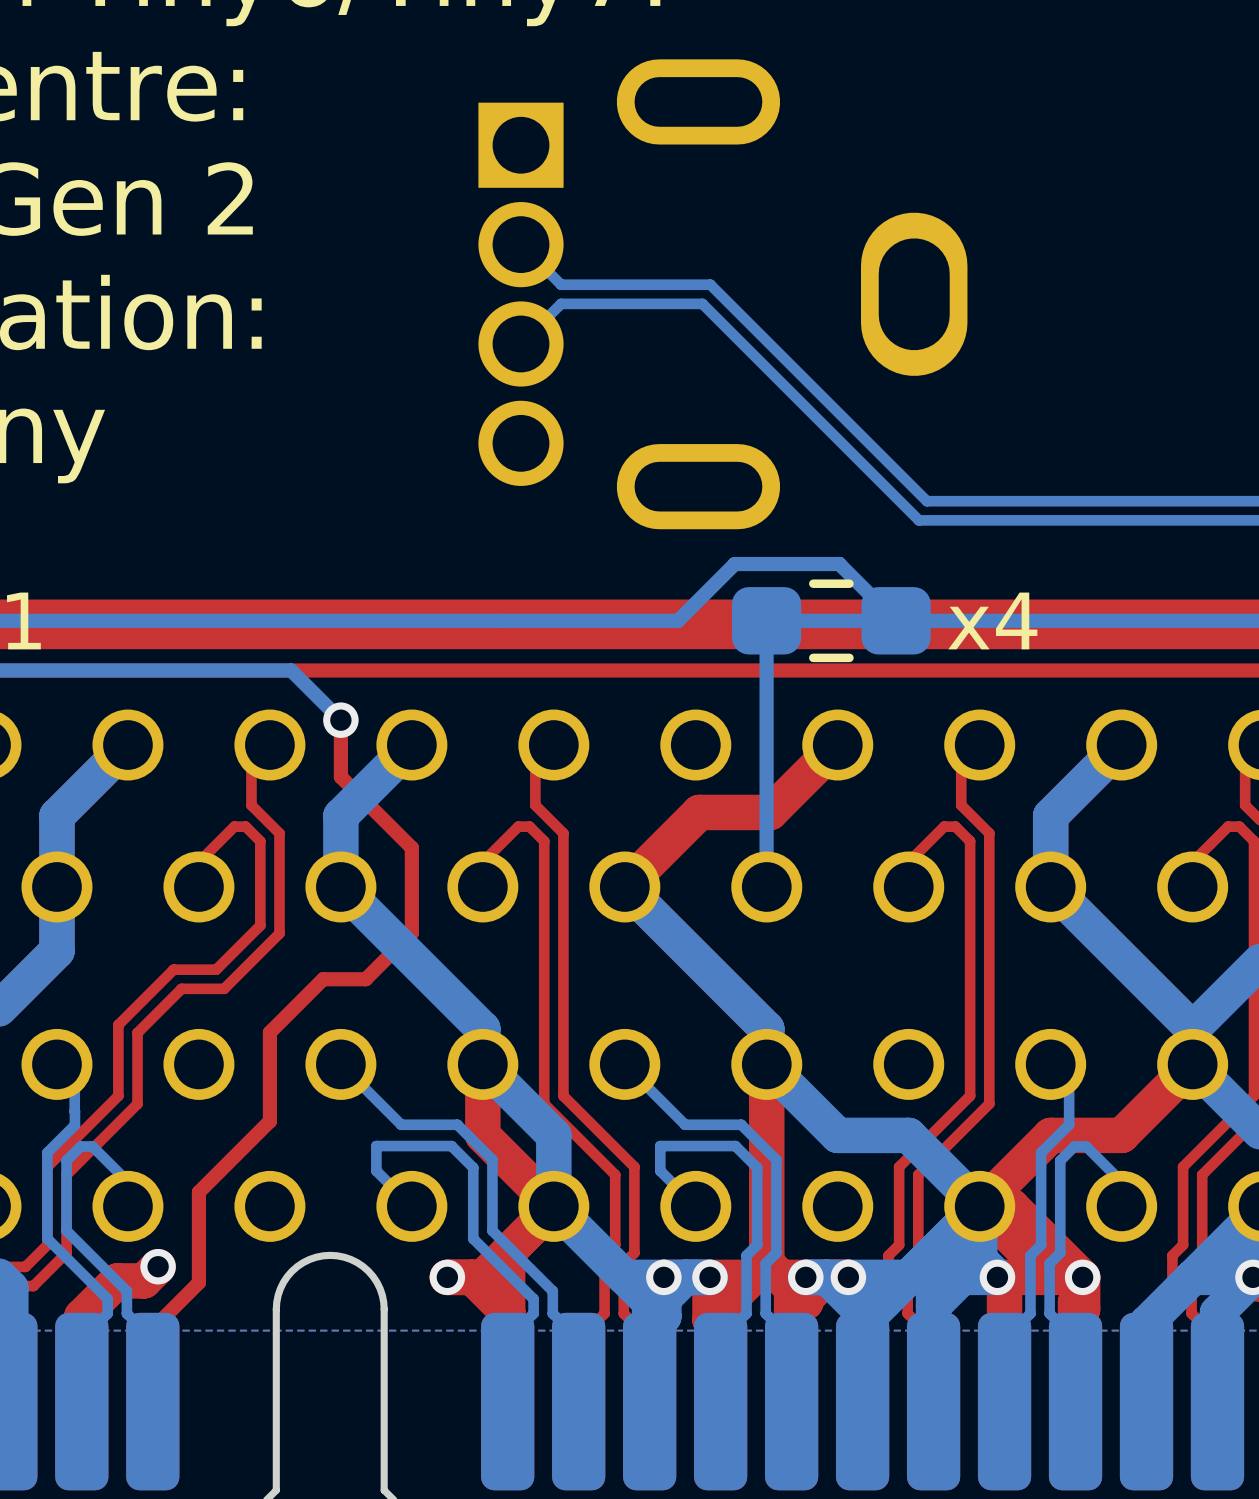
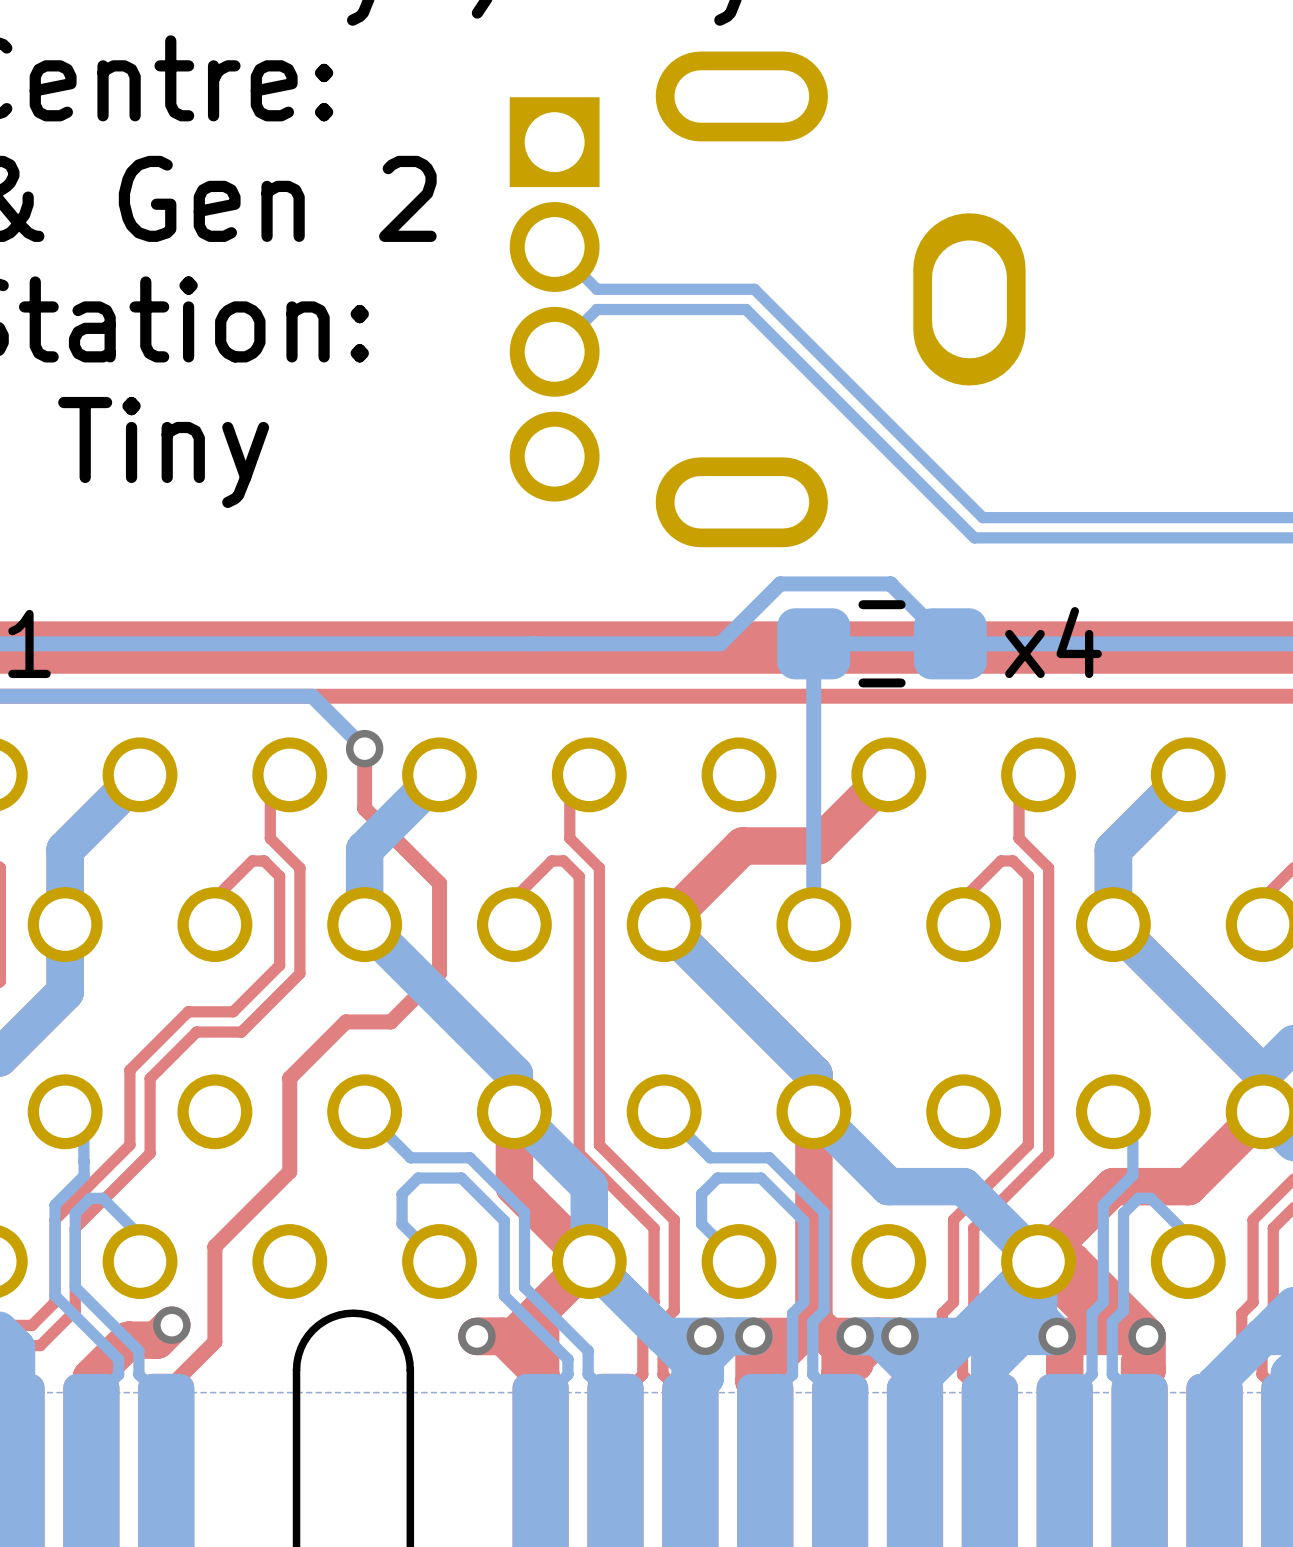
bottom track: (384, 1108) (401, 1124) (457, 1124) -> (410, 1157) (469, 1157) (487, 1175)
bottom track: (668, 1108) (685, 1124) (741, 1124) -> (710, 1157) (769, 1157) (787, 1175)
bottom track: (451, 1146) (376, 1146) -> (481, 1197) (461, 1178) (418, 1178) (402, 1194) (402, 1197)
bottom track: (735, 1146) (660, 1146) -> (780, 1197) (761, 1178) (717, 1178) (701, 1194) (701, 1197)

